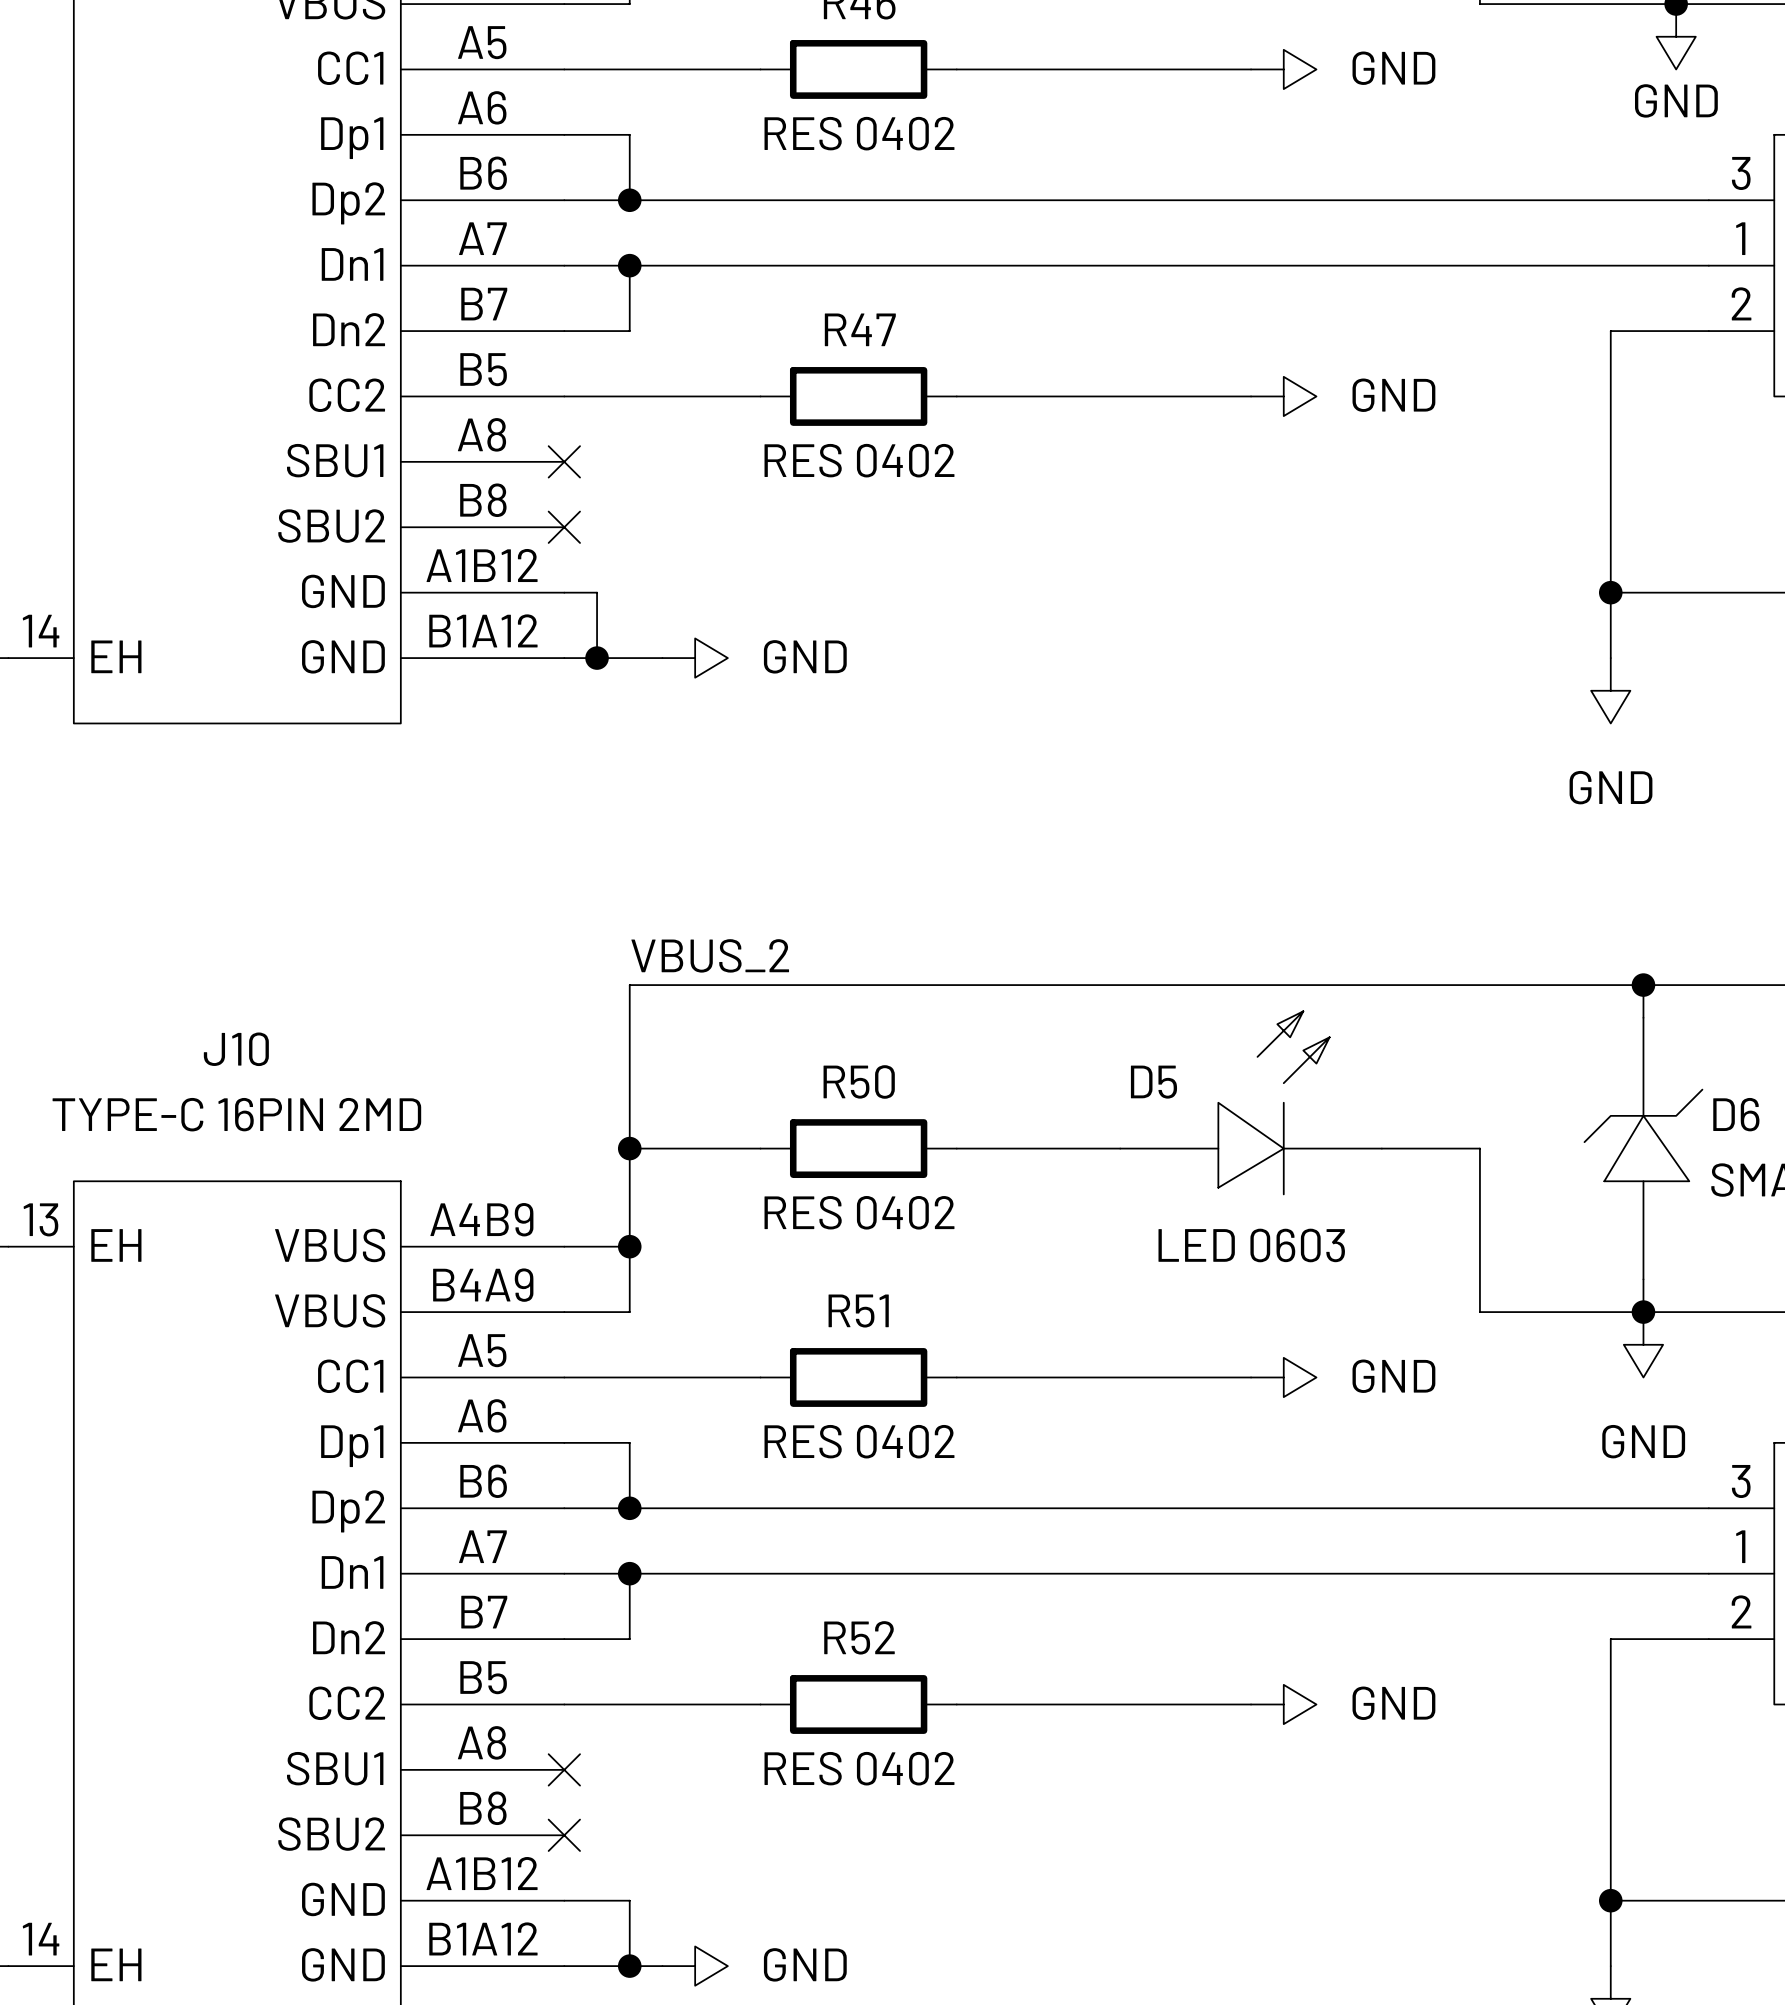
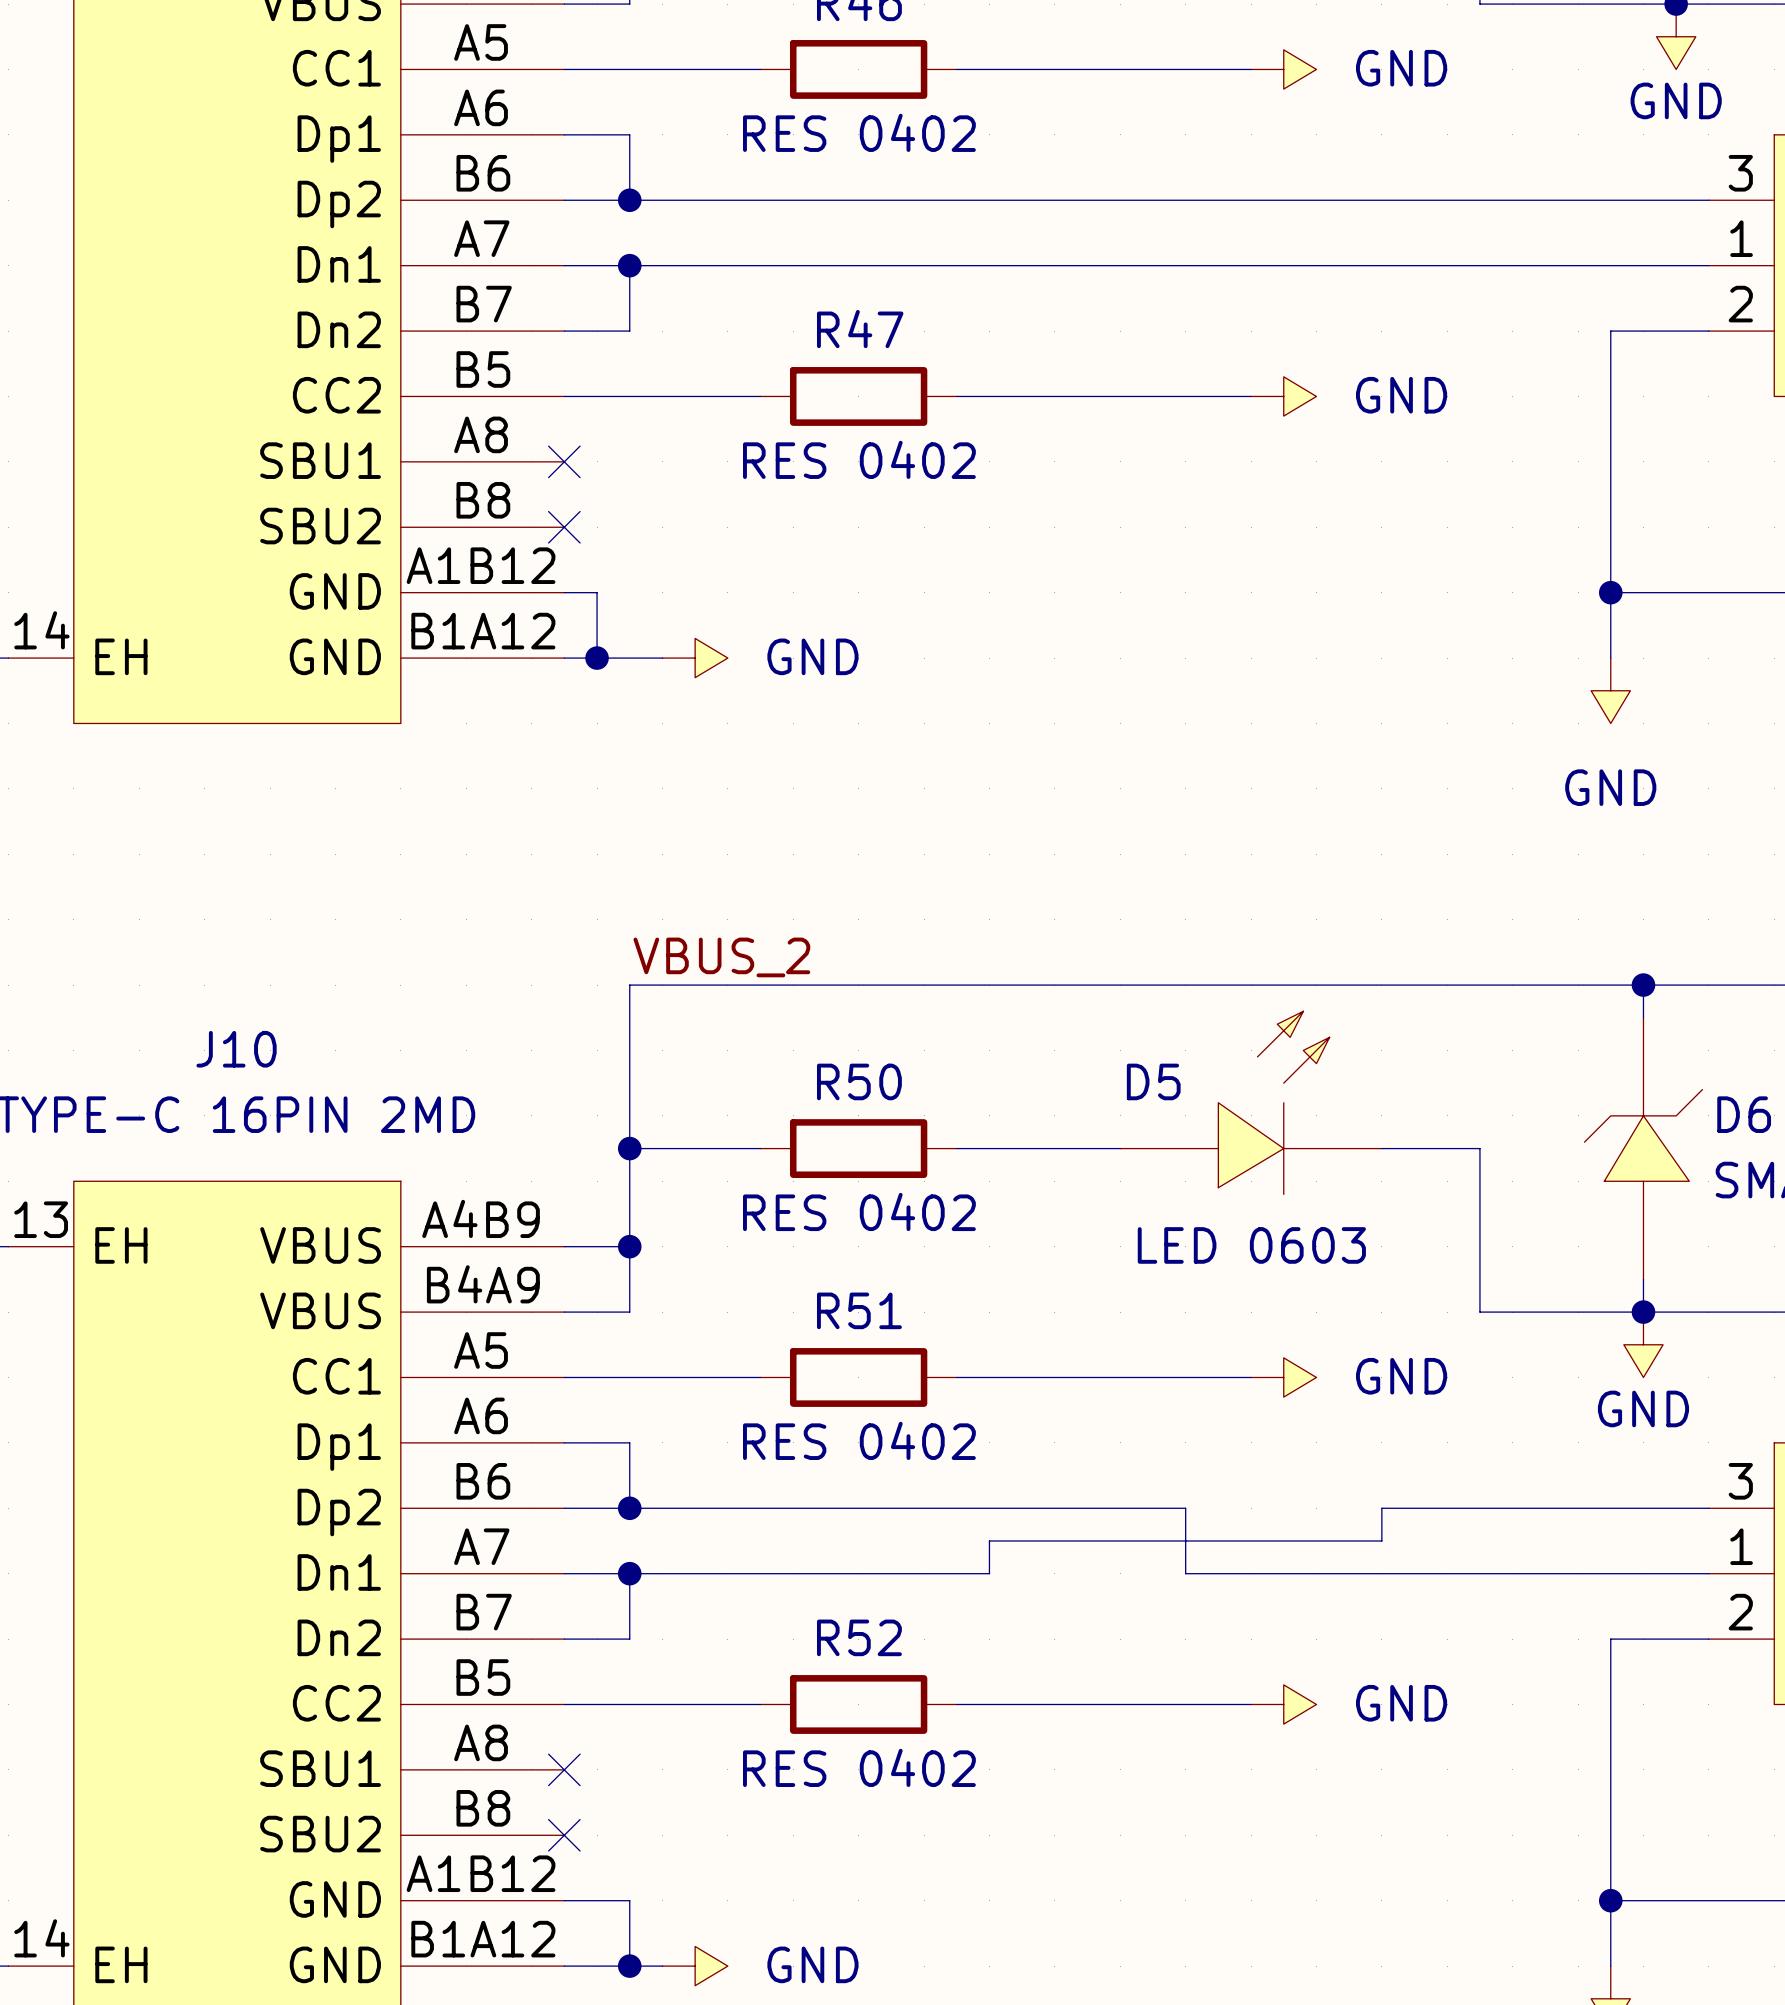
power symbol text position: GND (1643, 1441) -> GND (1643, 1408)
wire: (1185, 1508) (1381, 1508) -> (989, 1573) (989, 1540) (1381, 1540) (1381, 1508)
wire: (989, 1573) (1185, 1573) -> (1185, 1508) (1185, 1573)

